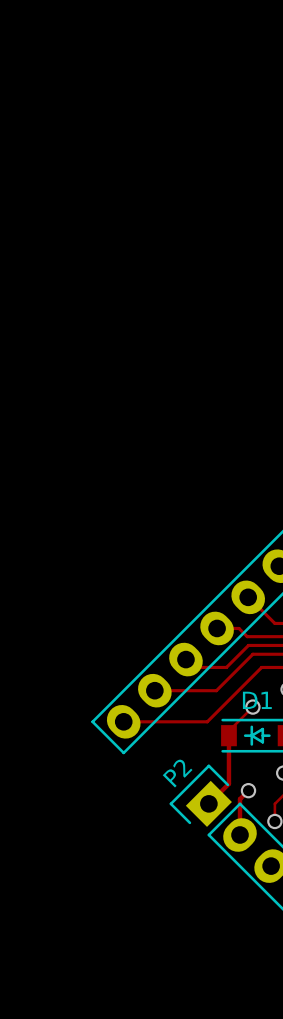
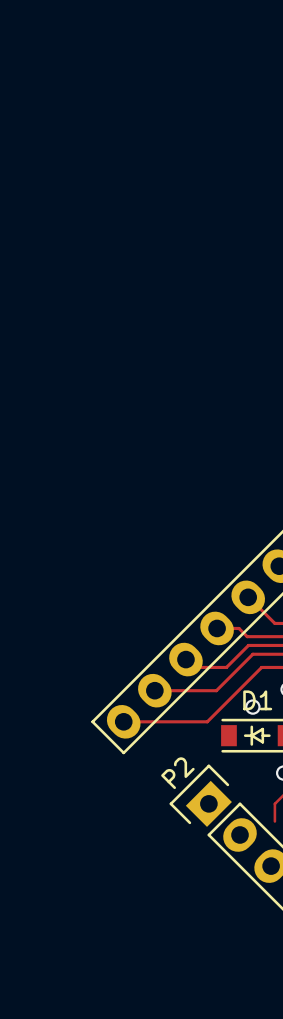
track: (252, 707) (228, 730) (228, 783) (208, 803) -> none
track: (248, 790) (240, 799) (240, 834) -> none
via: (248, 790) -> none
via: (274, 821) -> none

